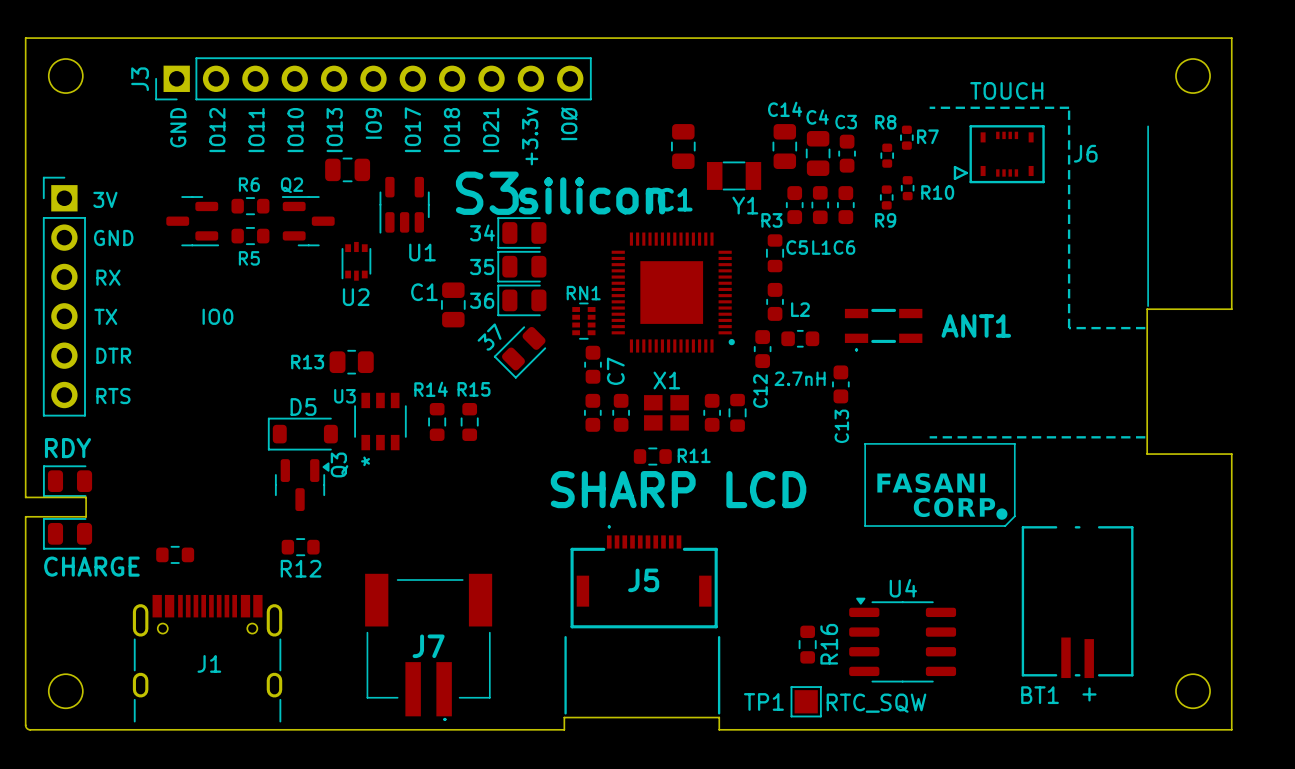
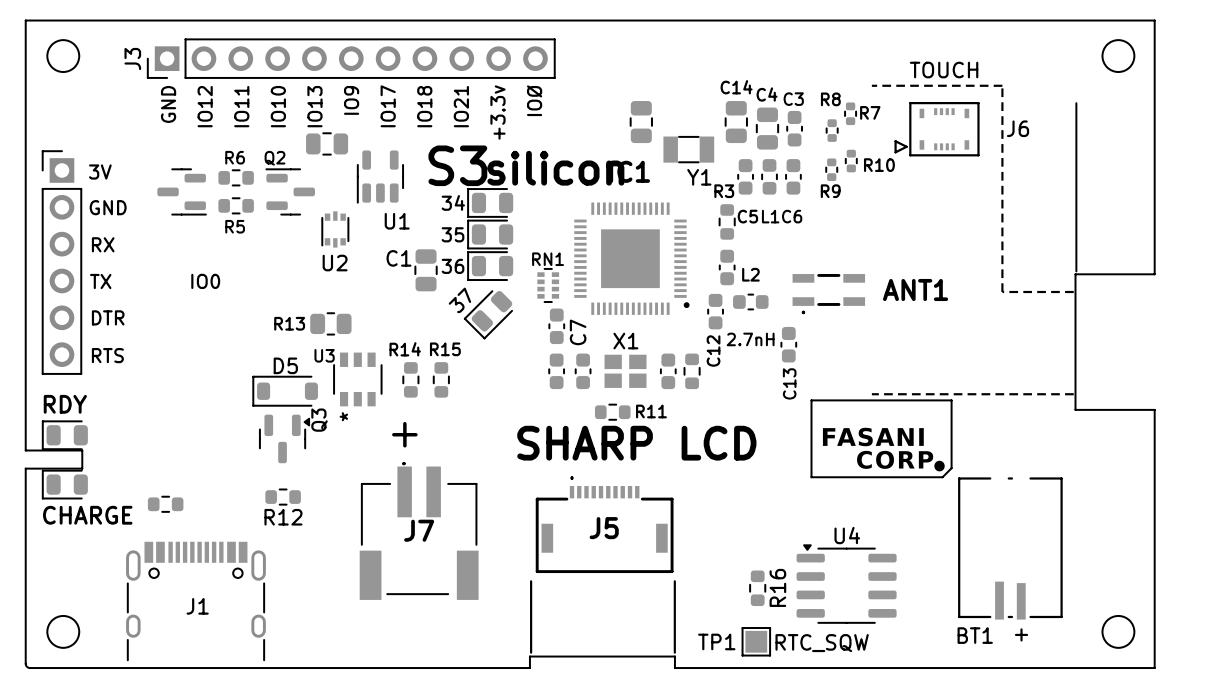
text: none -> + (404, 434)
J7 rotation: 0° (428, 647) -> 180° (419, 531)

